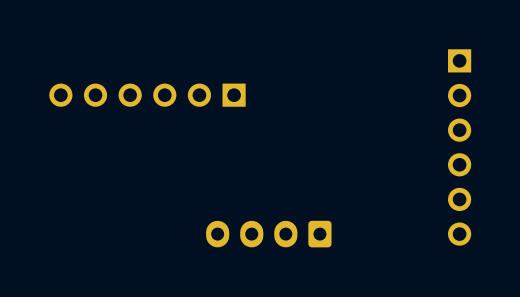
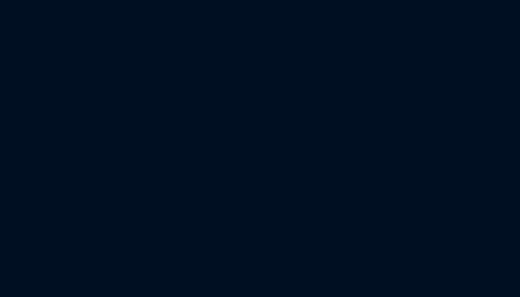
part: (147, 95) -> none
part: (459, 147) -> none
part: (268, 234) -> none

